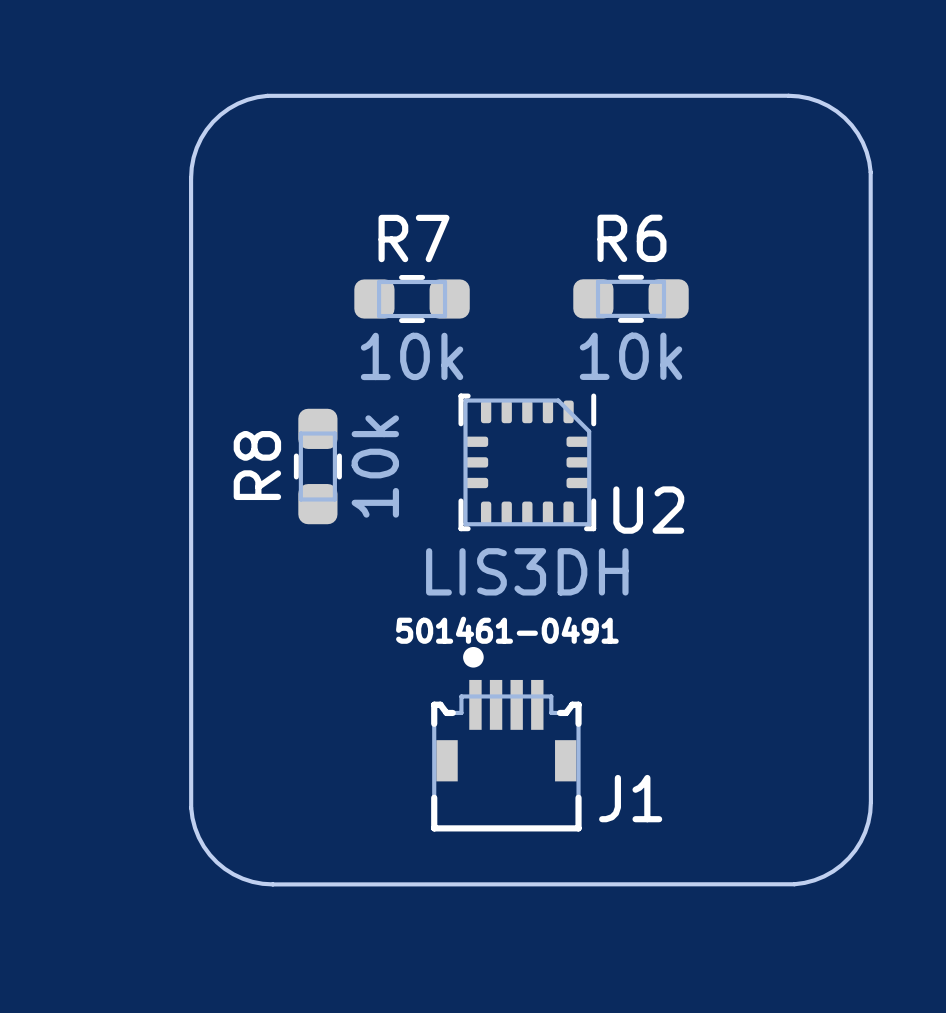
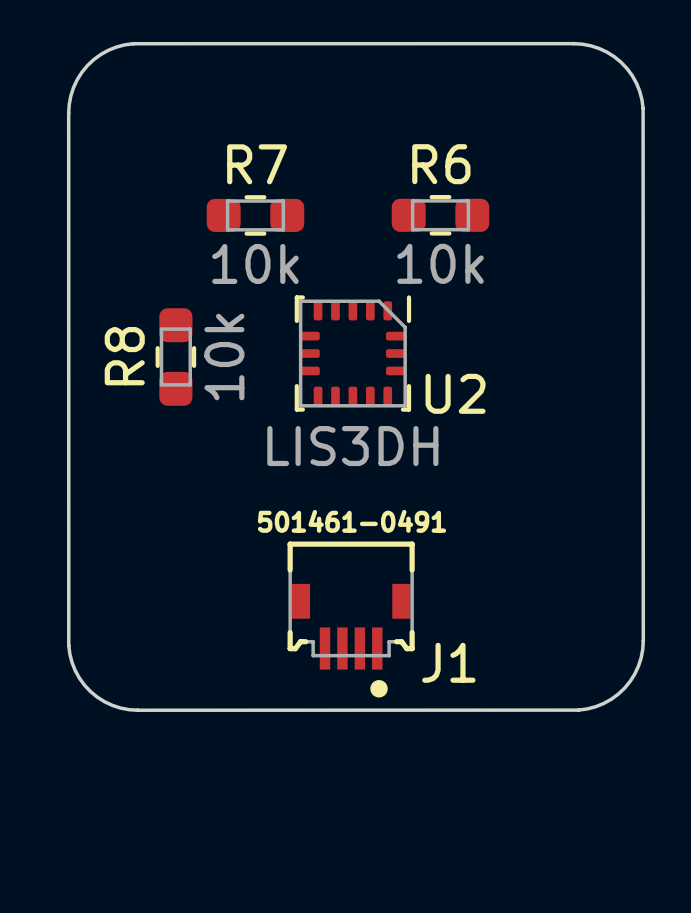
J1 footprint: [431, 646, 582, 832] -> [287, 541, 415, 698]

